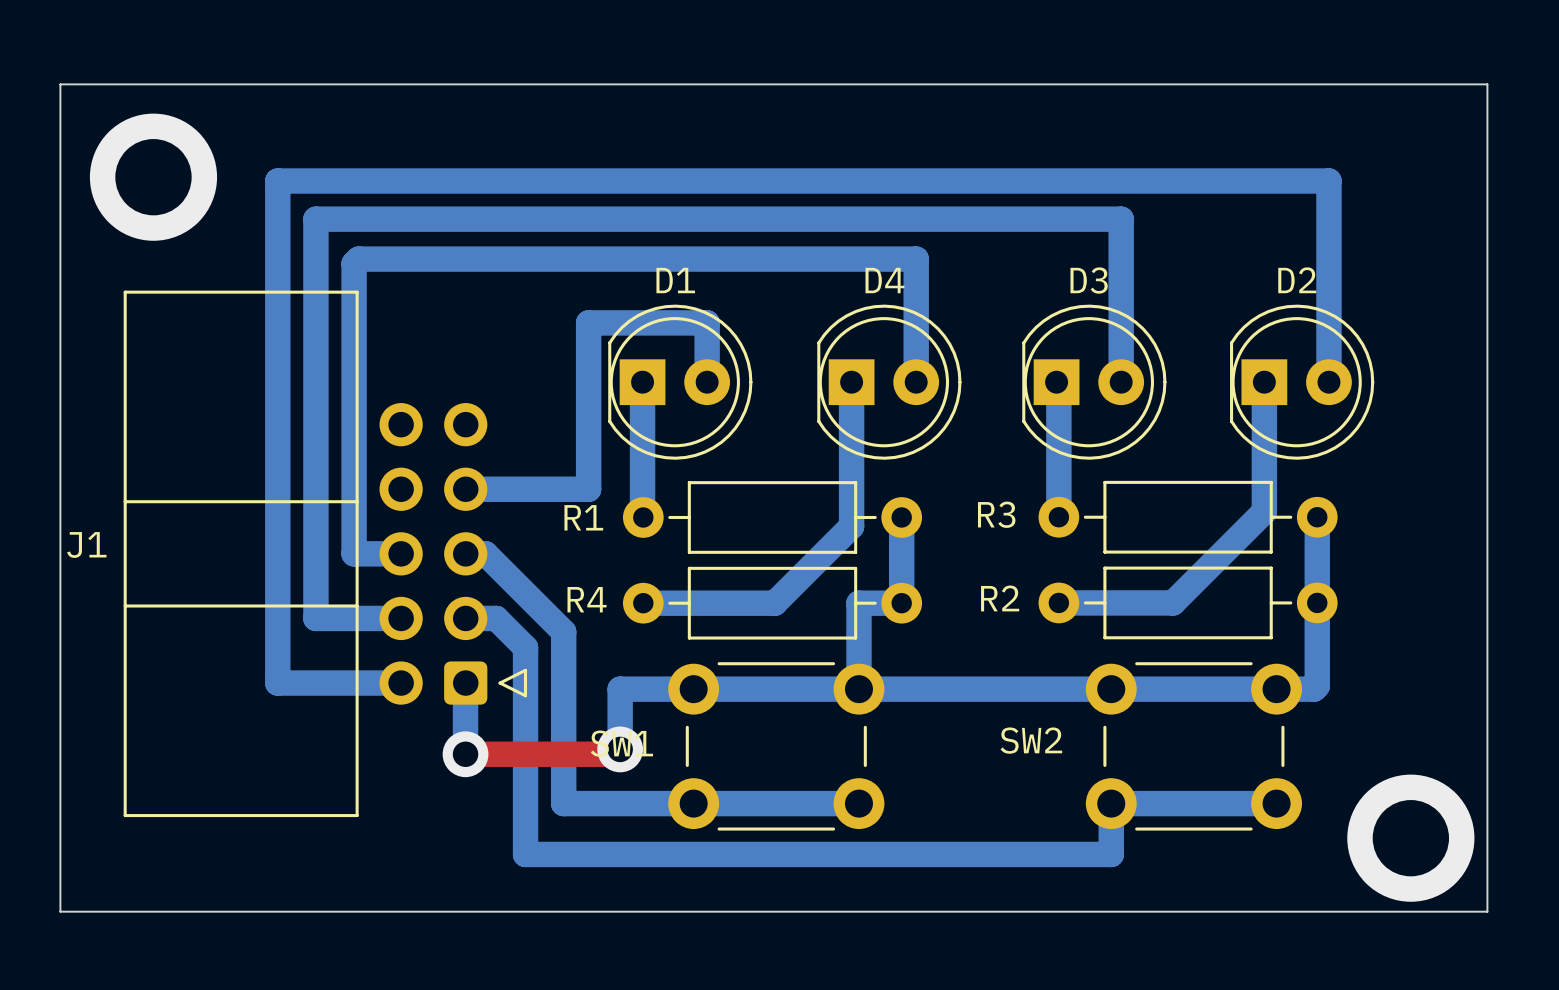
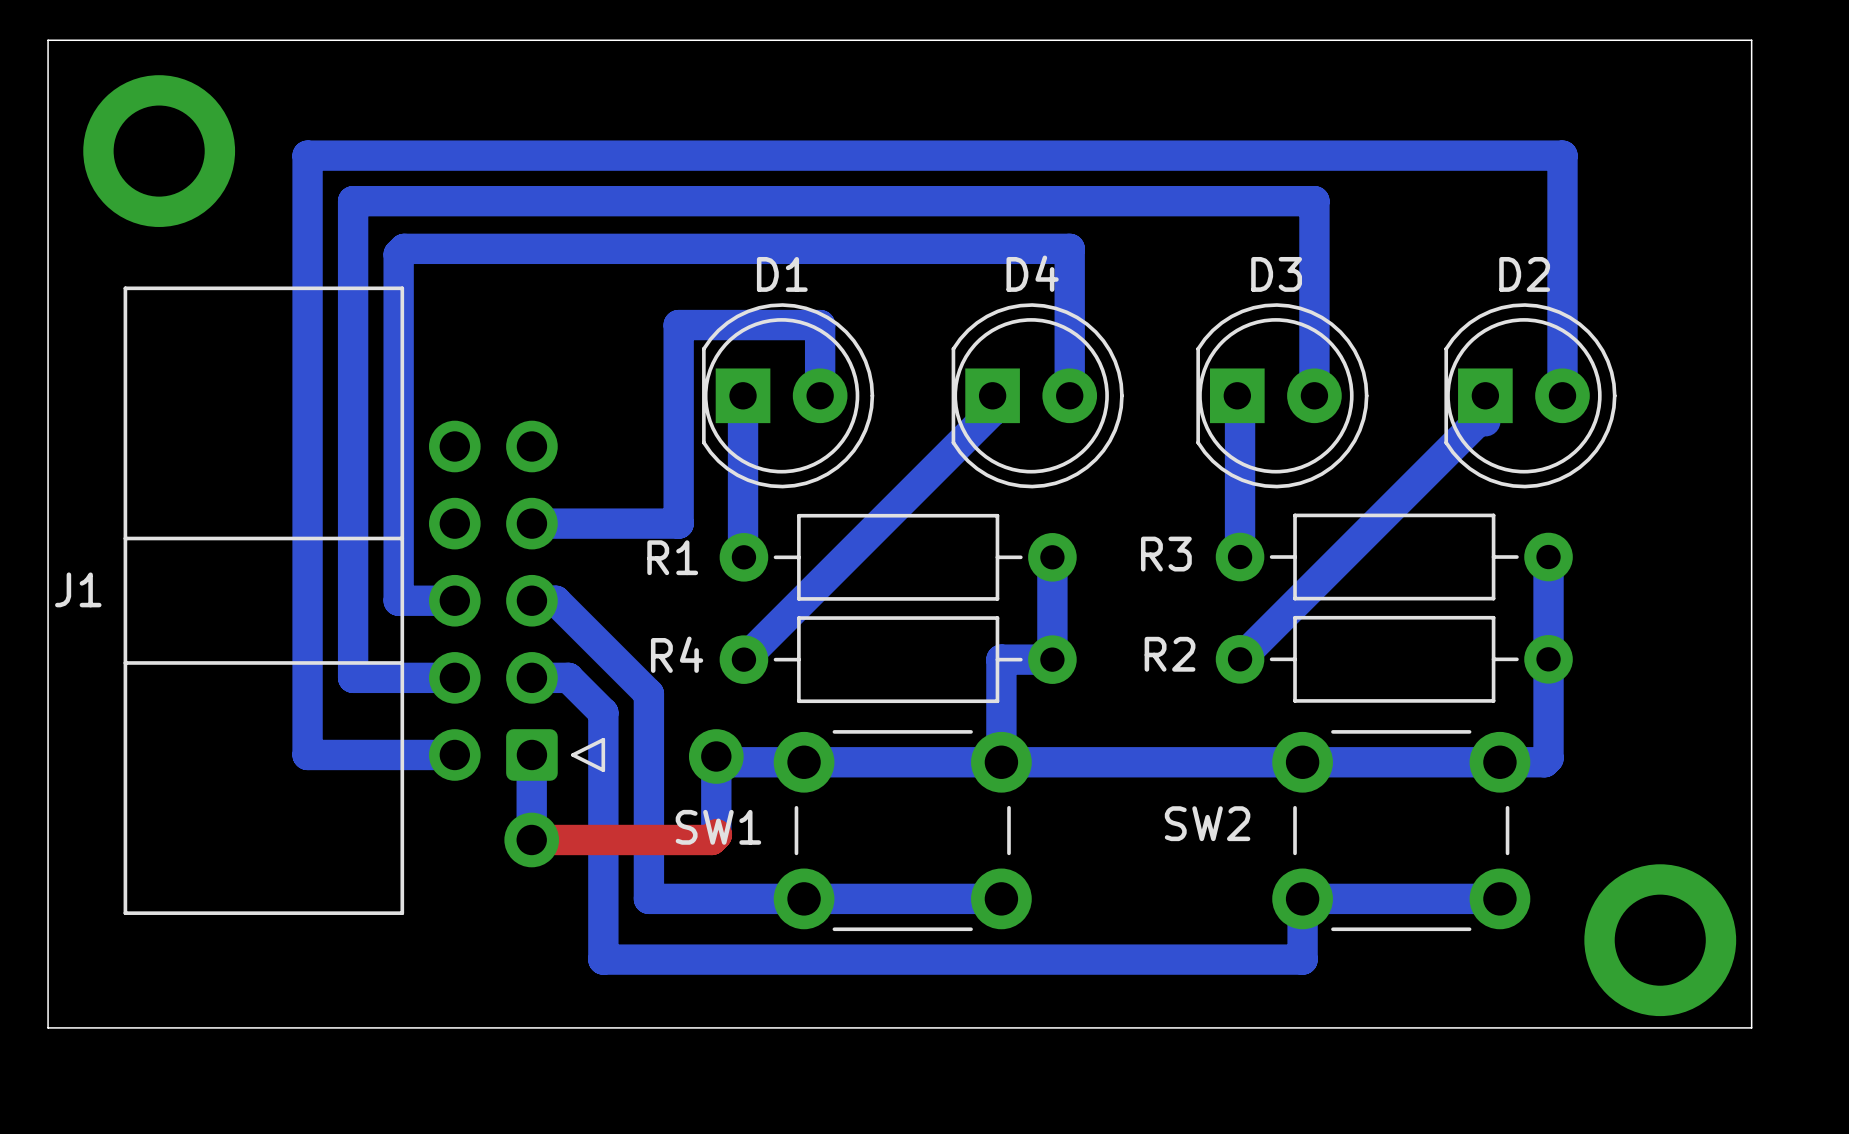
bottom track: (851, 394) (851, 526) (774, 603) (643, 603) -> (992, 410) (743, 659)
bottom track: (1264, 403) (1264, 511) (1173, 602) (1058, 602) -> (1485, 414) (1240, 659)
via position: (620, 749) -> (716, 756)

